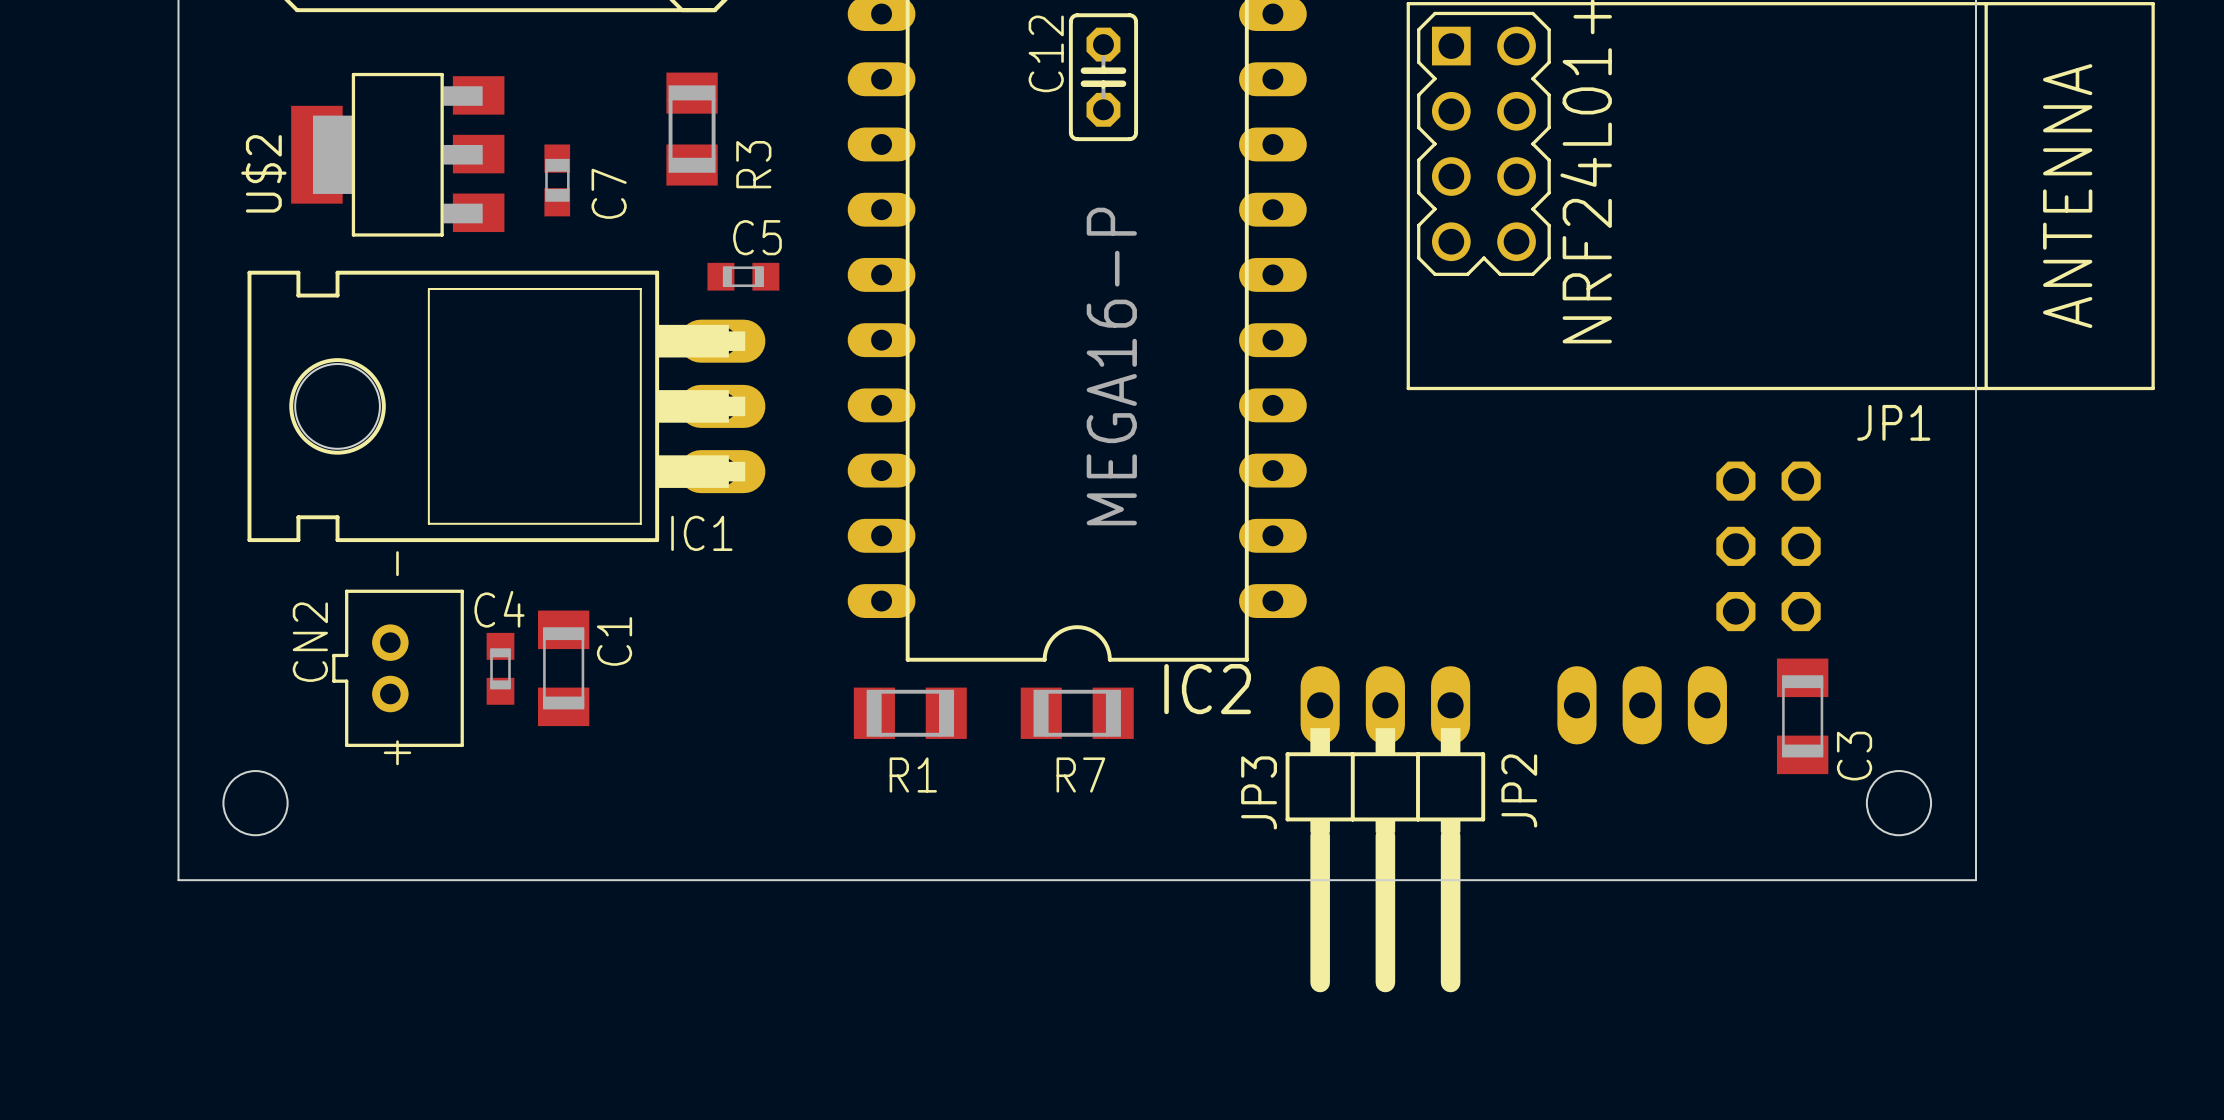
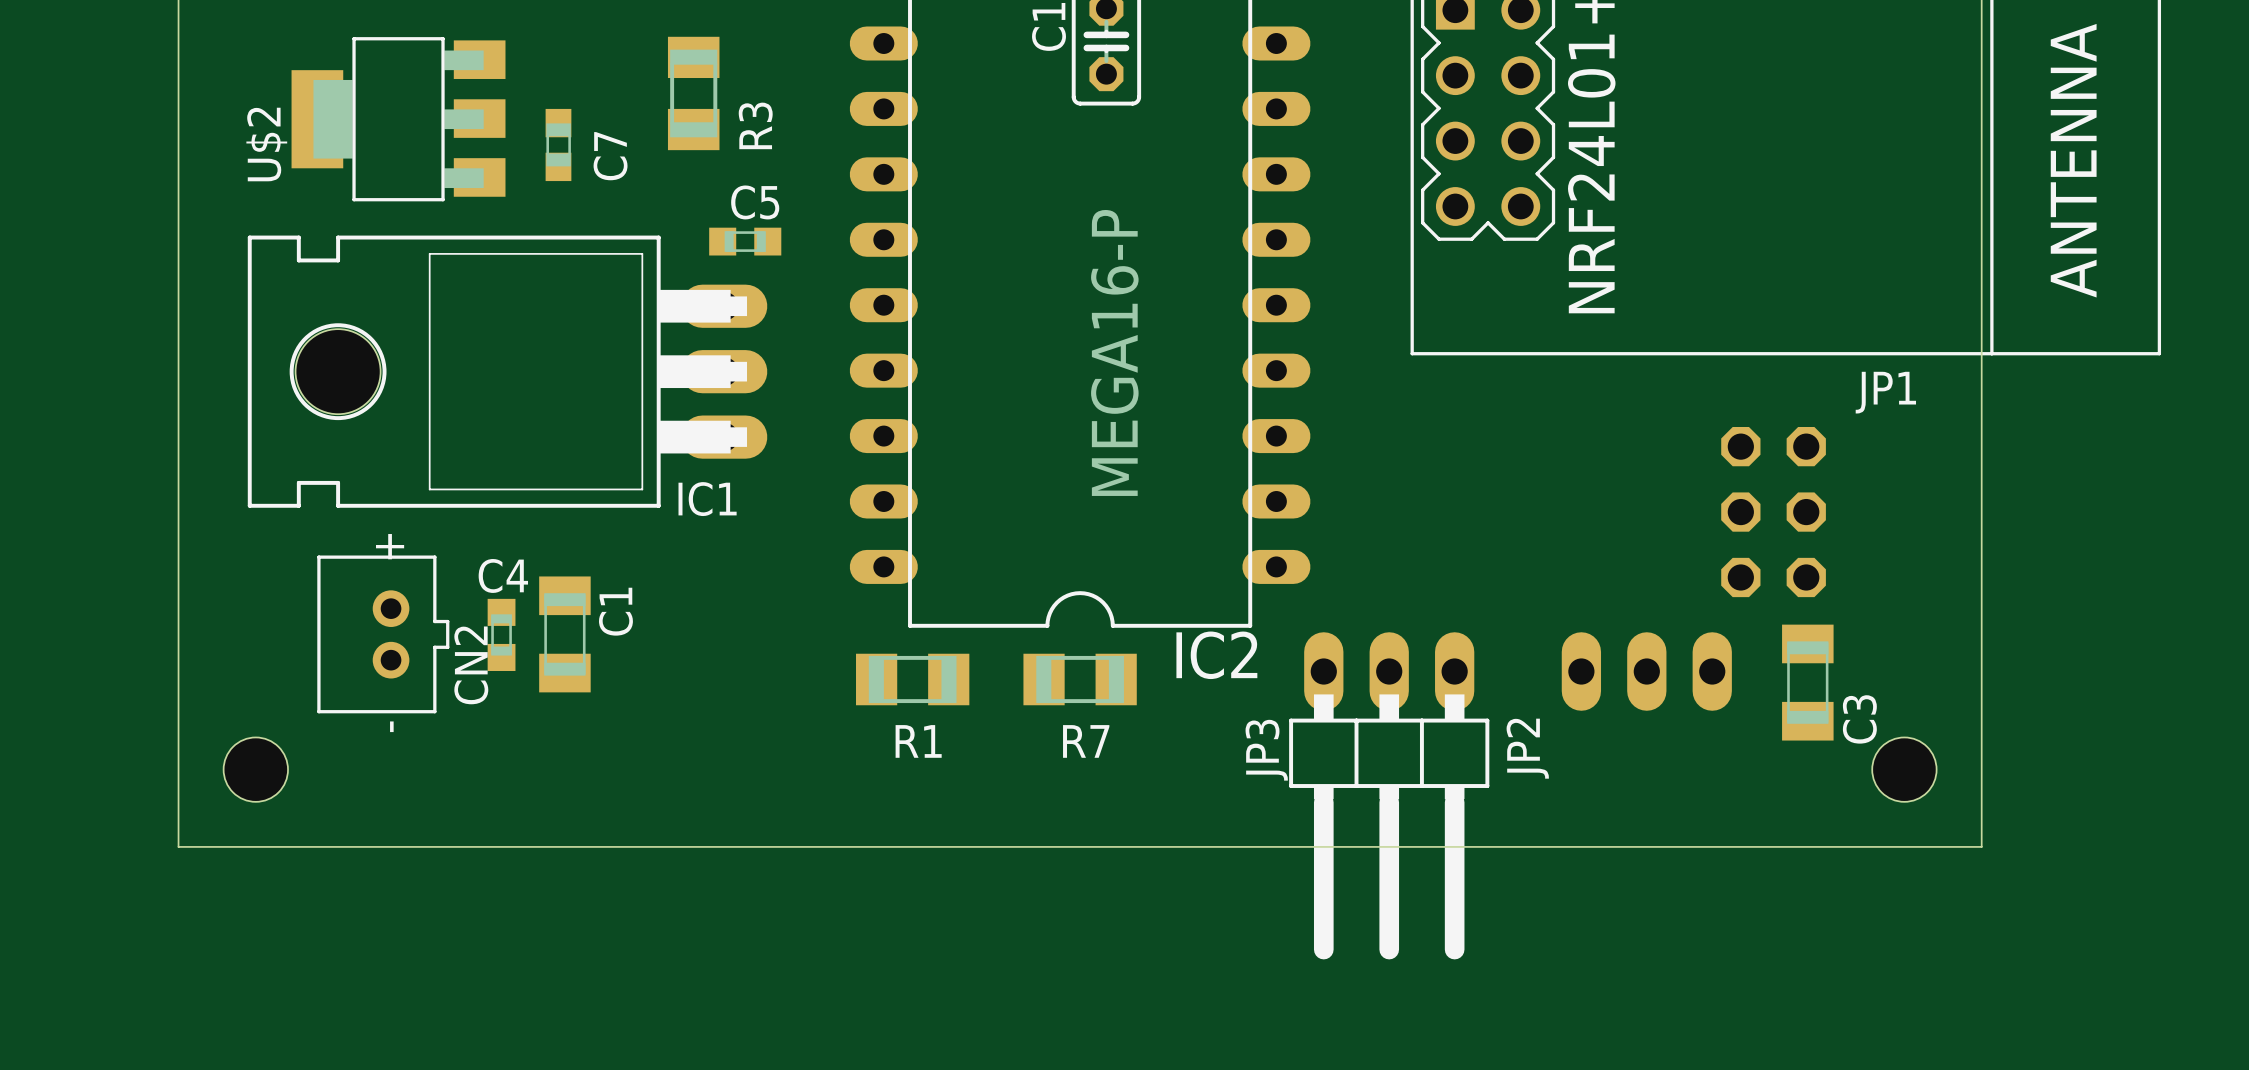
CN2 footprint: [332, 589, 464, 747] -> [317, 555, 450, 714]
CN2 name position: CN2 (310, 642) -> CN2 (471, 665)

